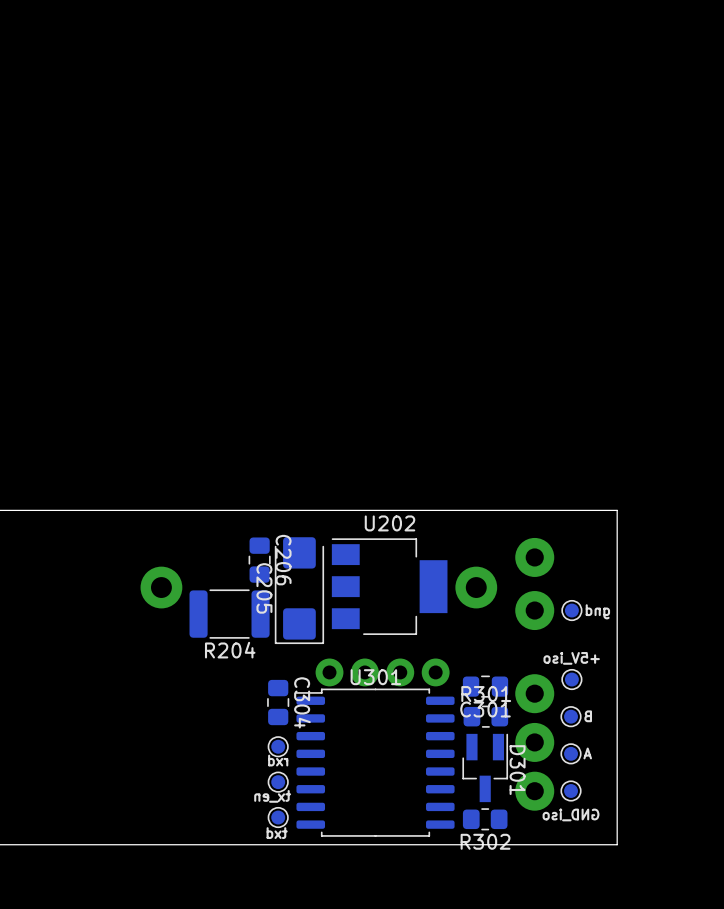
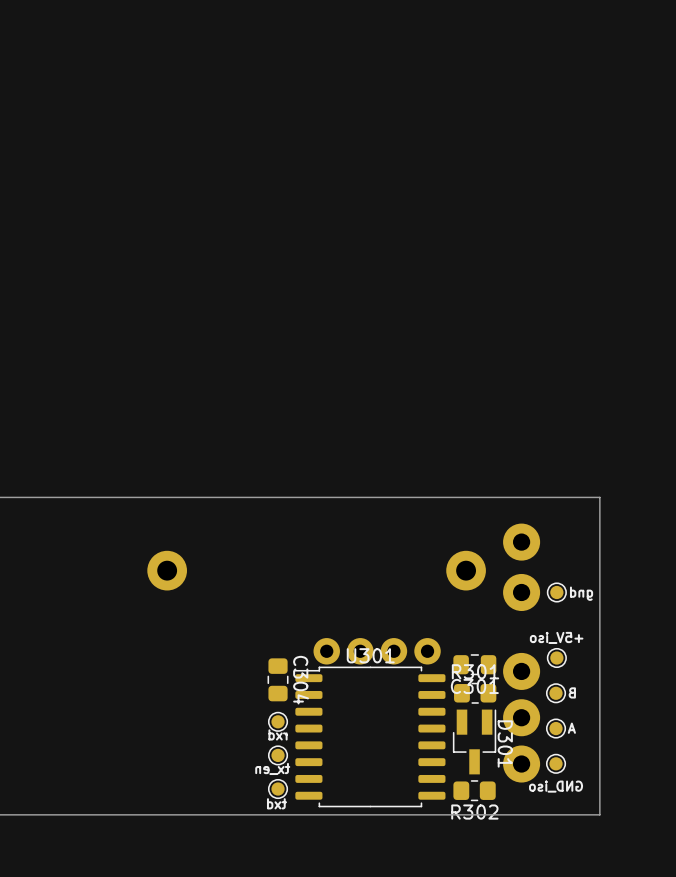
C206: (259, 560) -> none
U202: (389, 586) -> none
C205: (299, 590) -> none
R204: (229, 614) -> none

